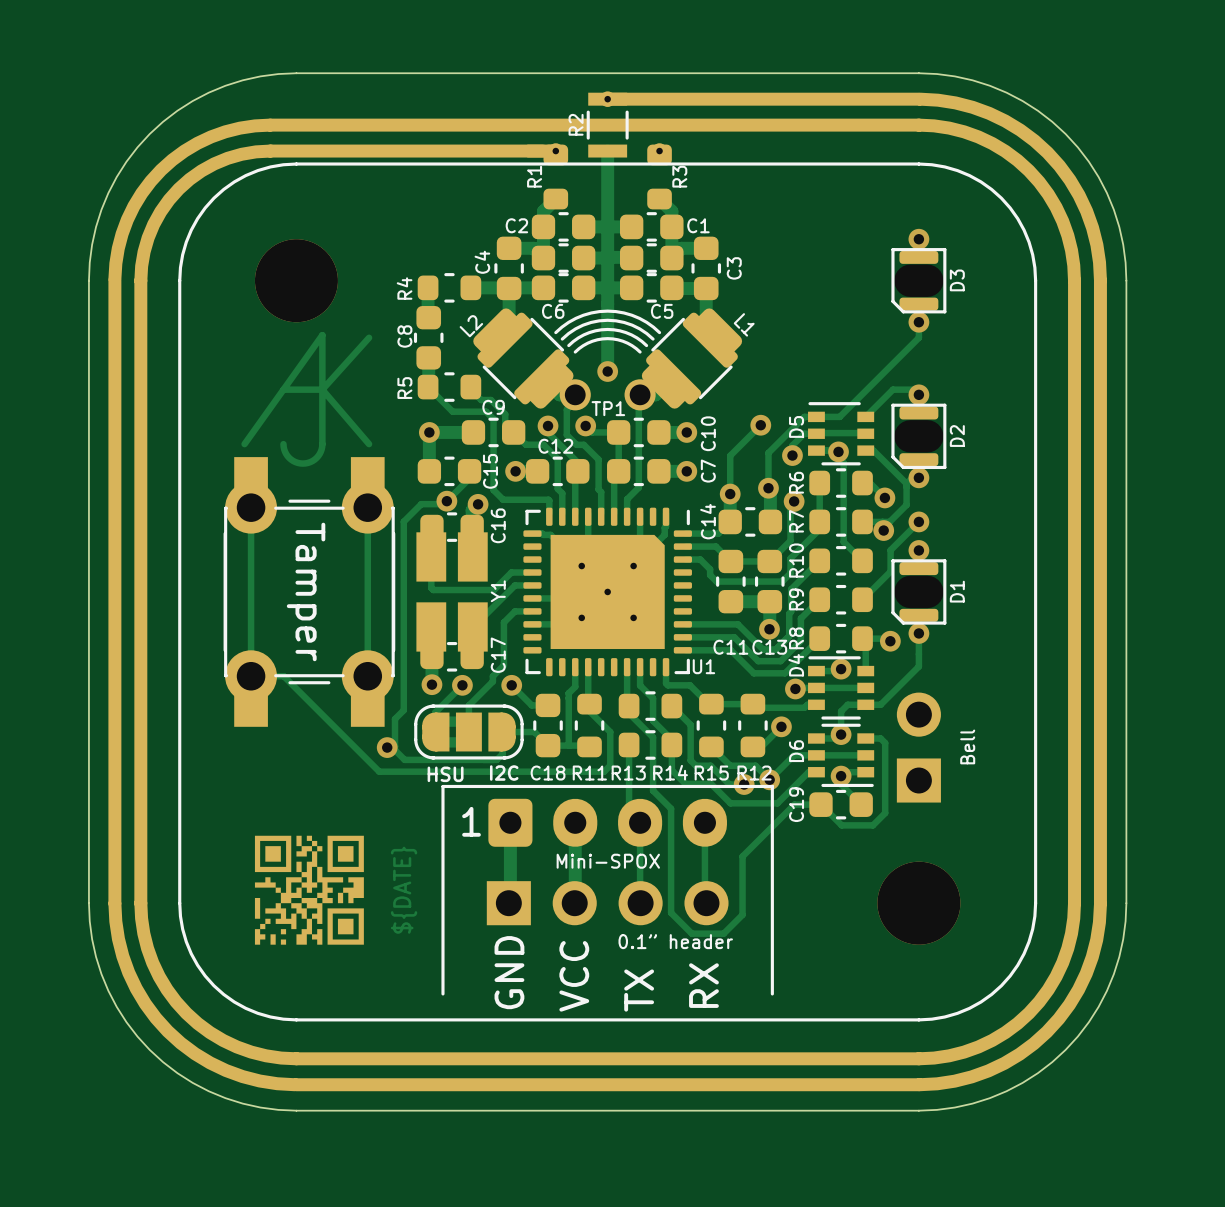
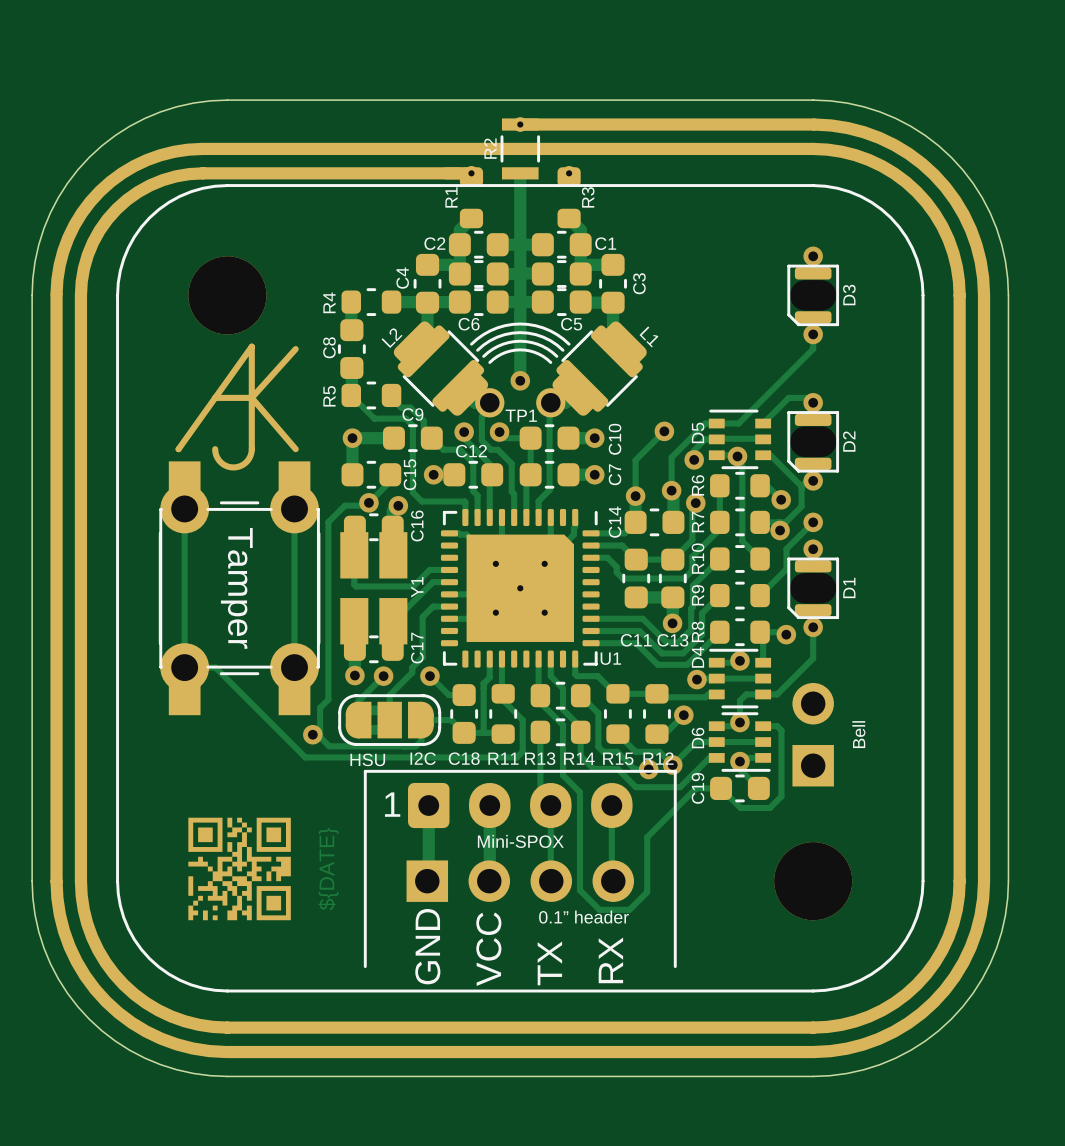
drawing: [241, 331, 373, 467] -> none
part: none -> (237, 407)

